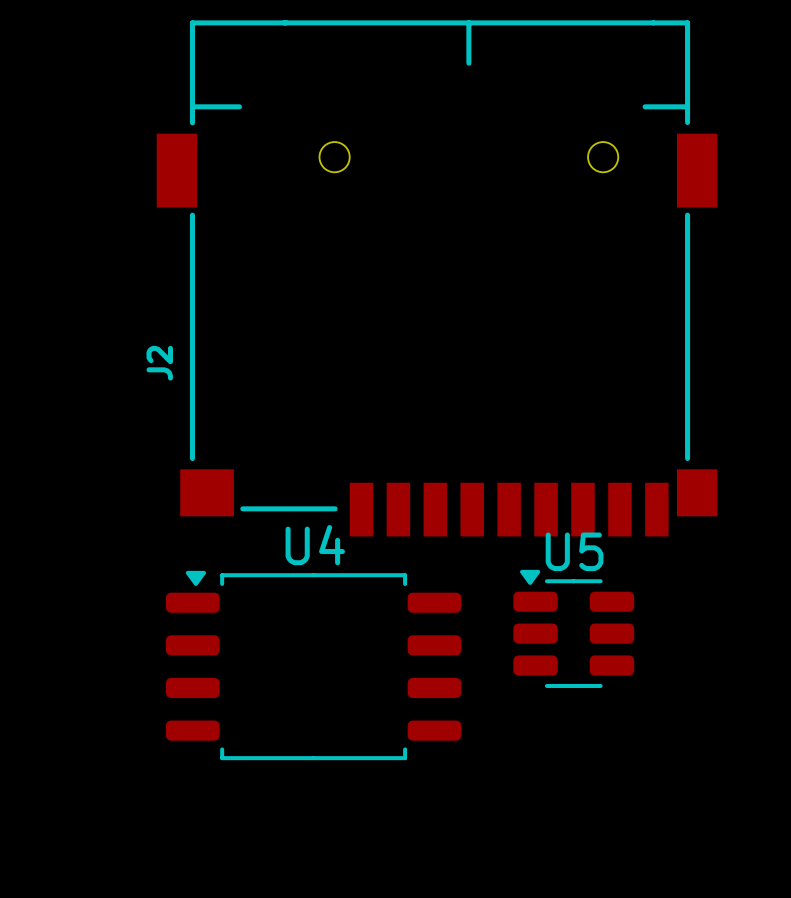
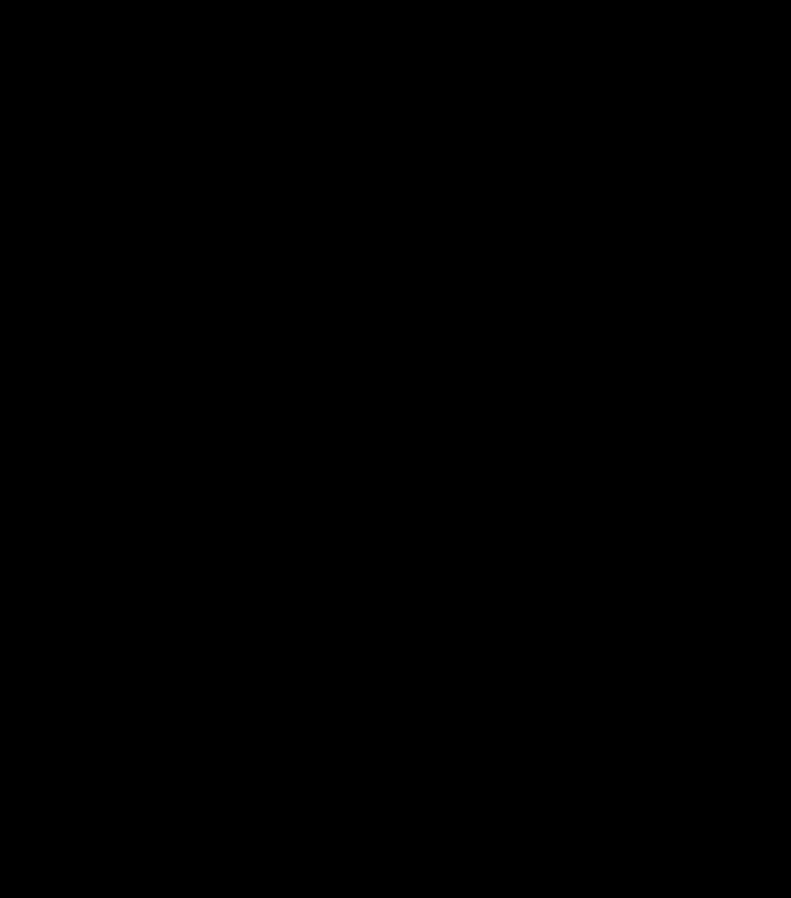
J2: (436, 278) -> none
U5: (573, 628) -> none
U4: (313, 665) -> none

